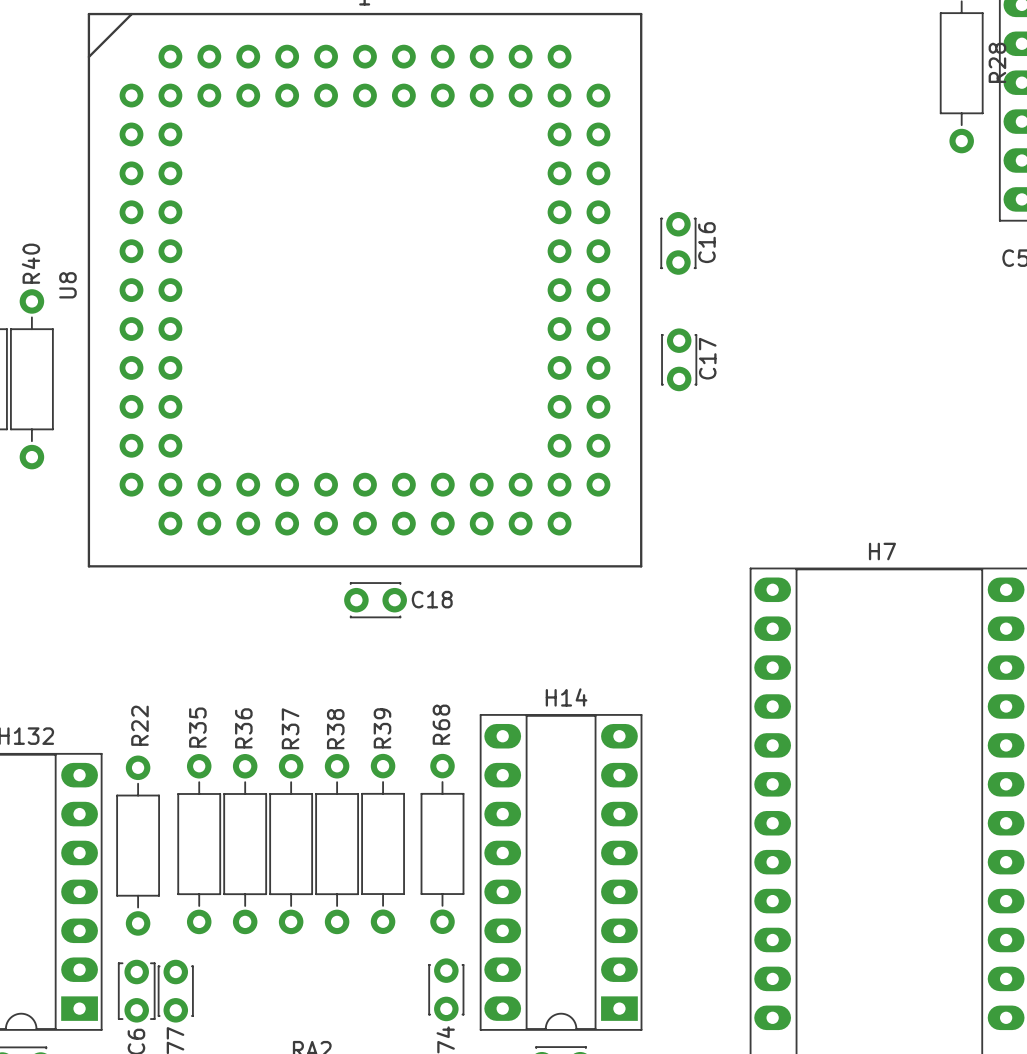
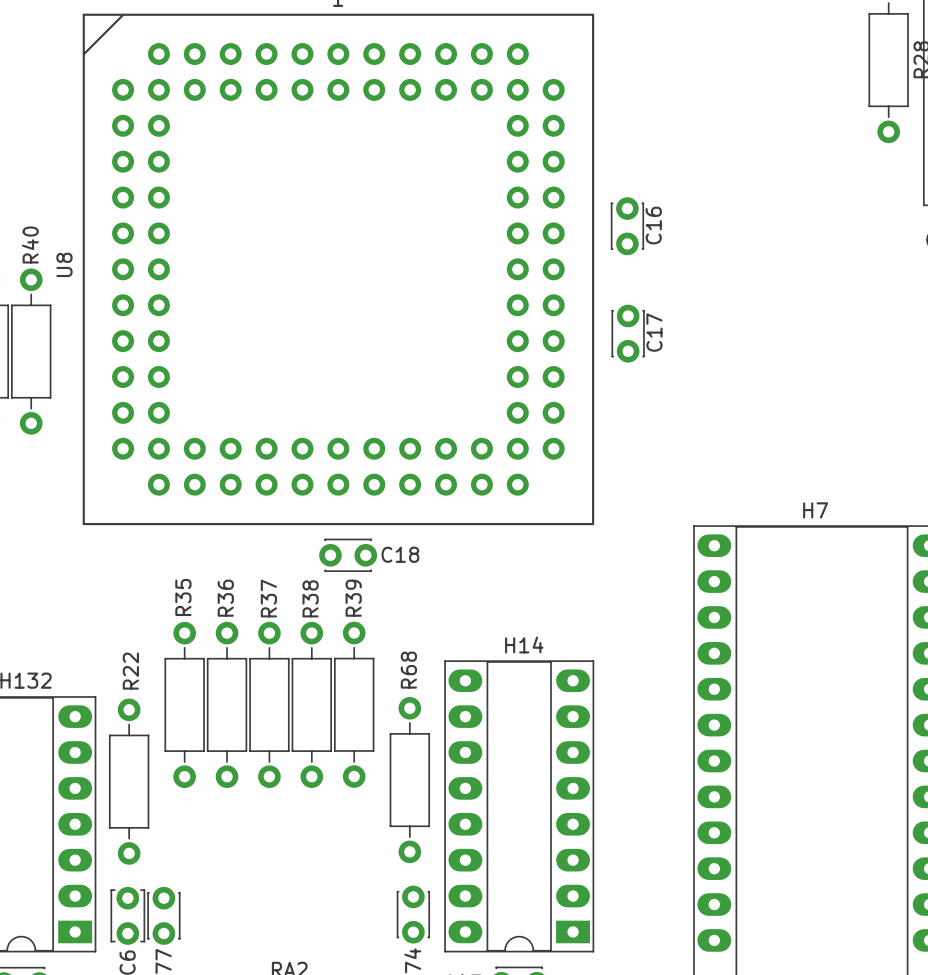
R39 position: (383, 843) -> (354, 704)
R35 position: (199, 844) -> (184, 704)
R36 position: (245, 844) -> (227, 704)
R37 position: (291, 844) -> (269, 704)
R38 position: (337, 844) -> (311, 704)

